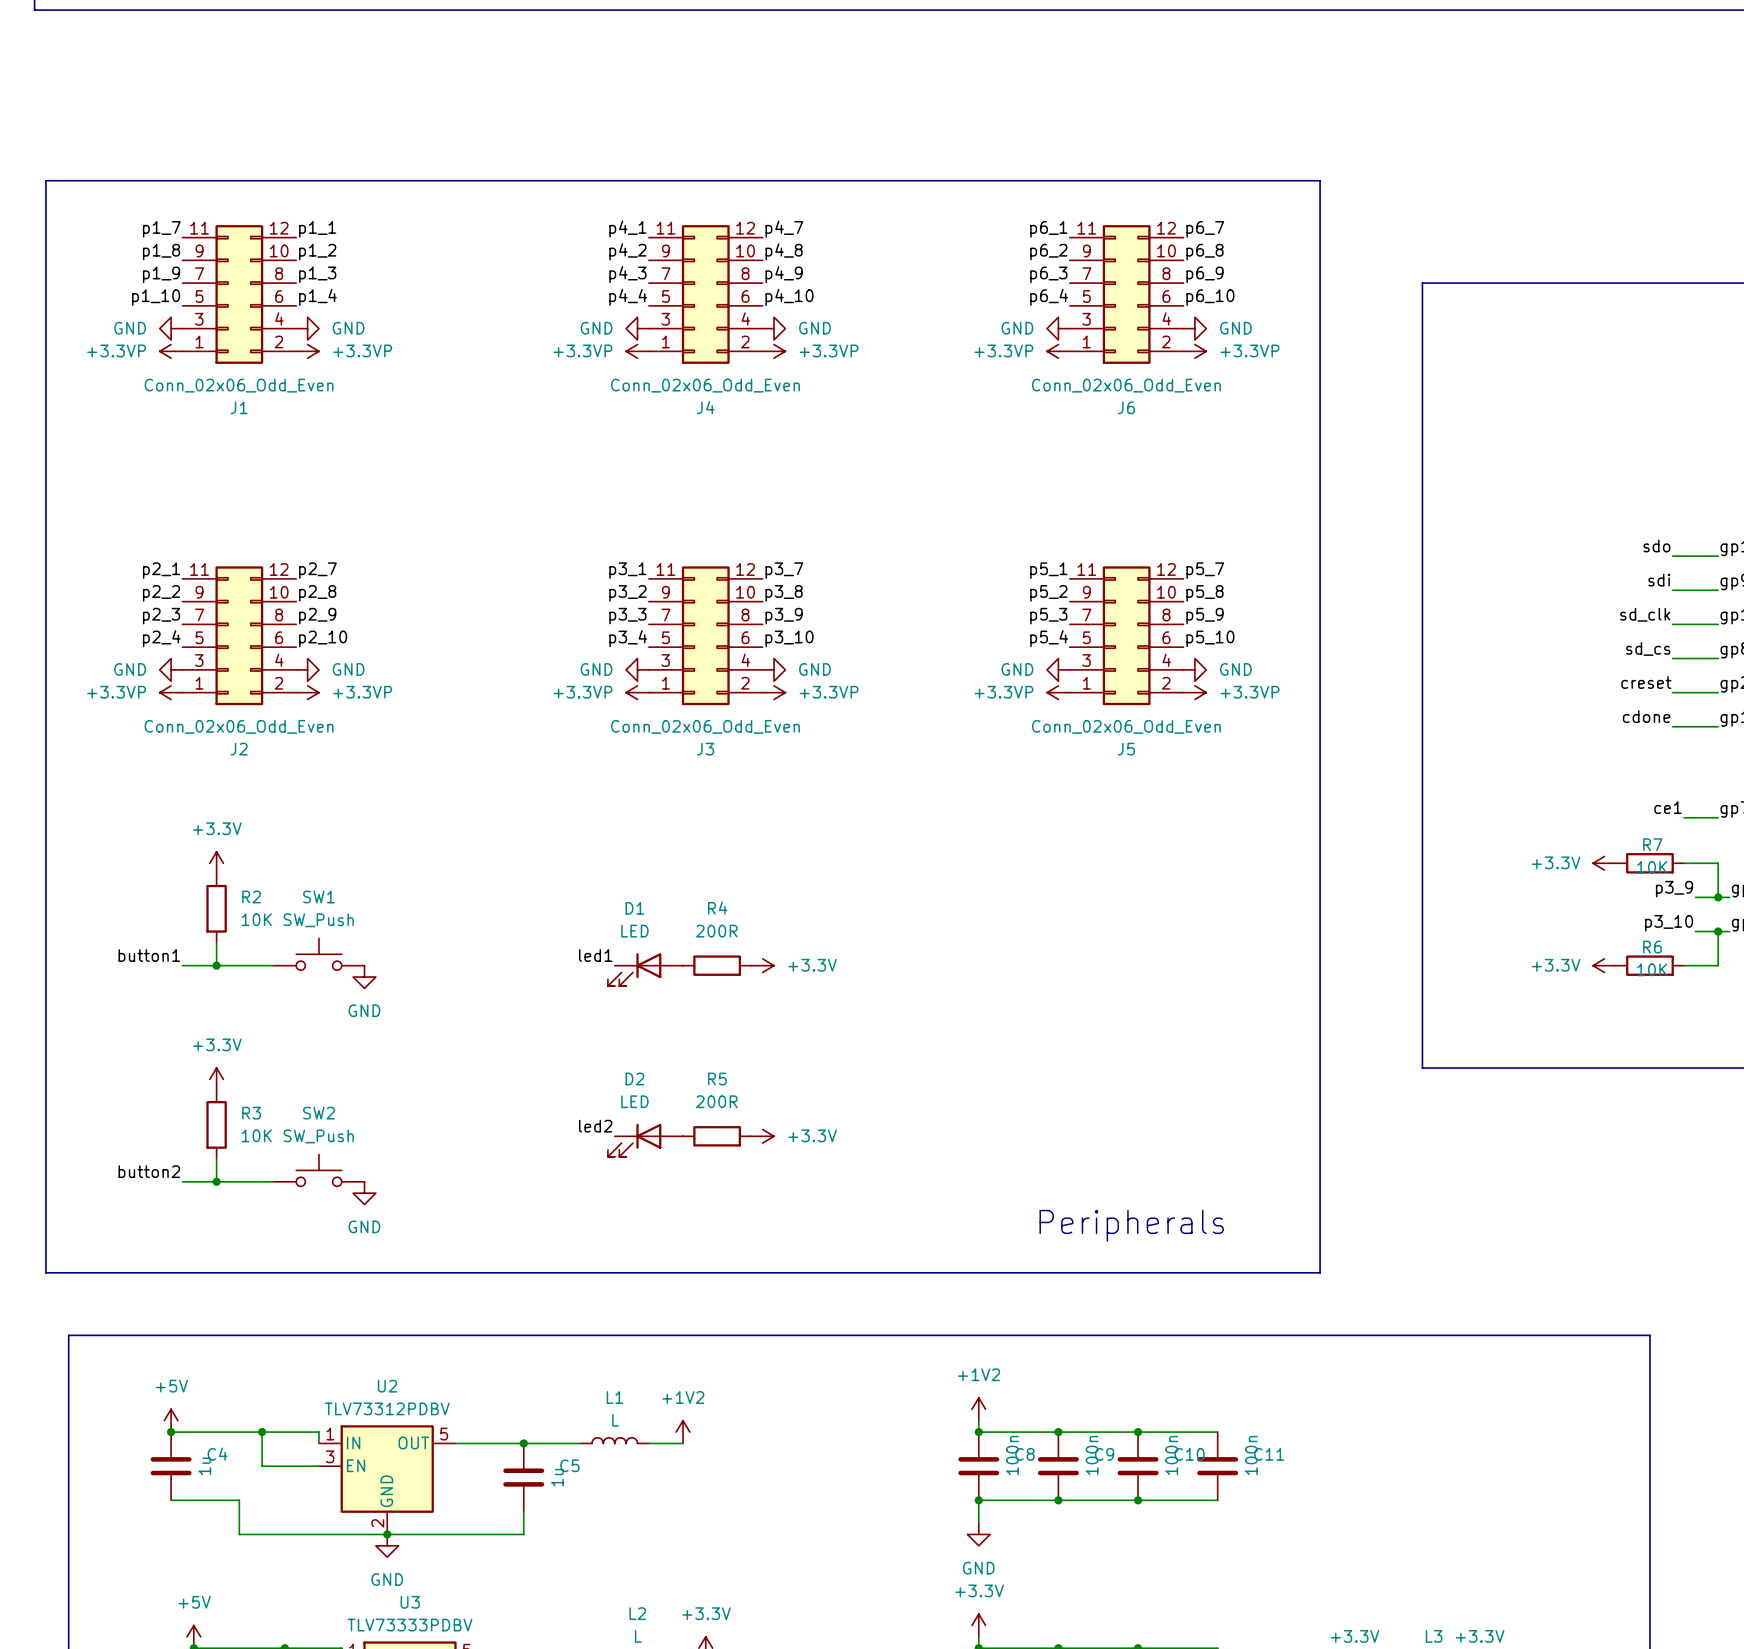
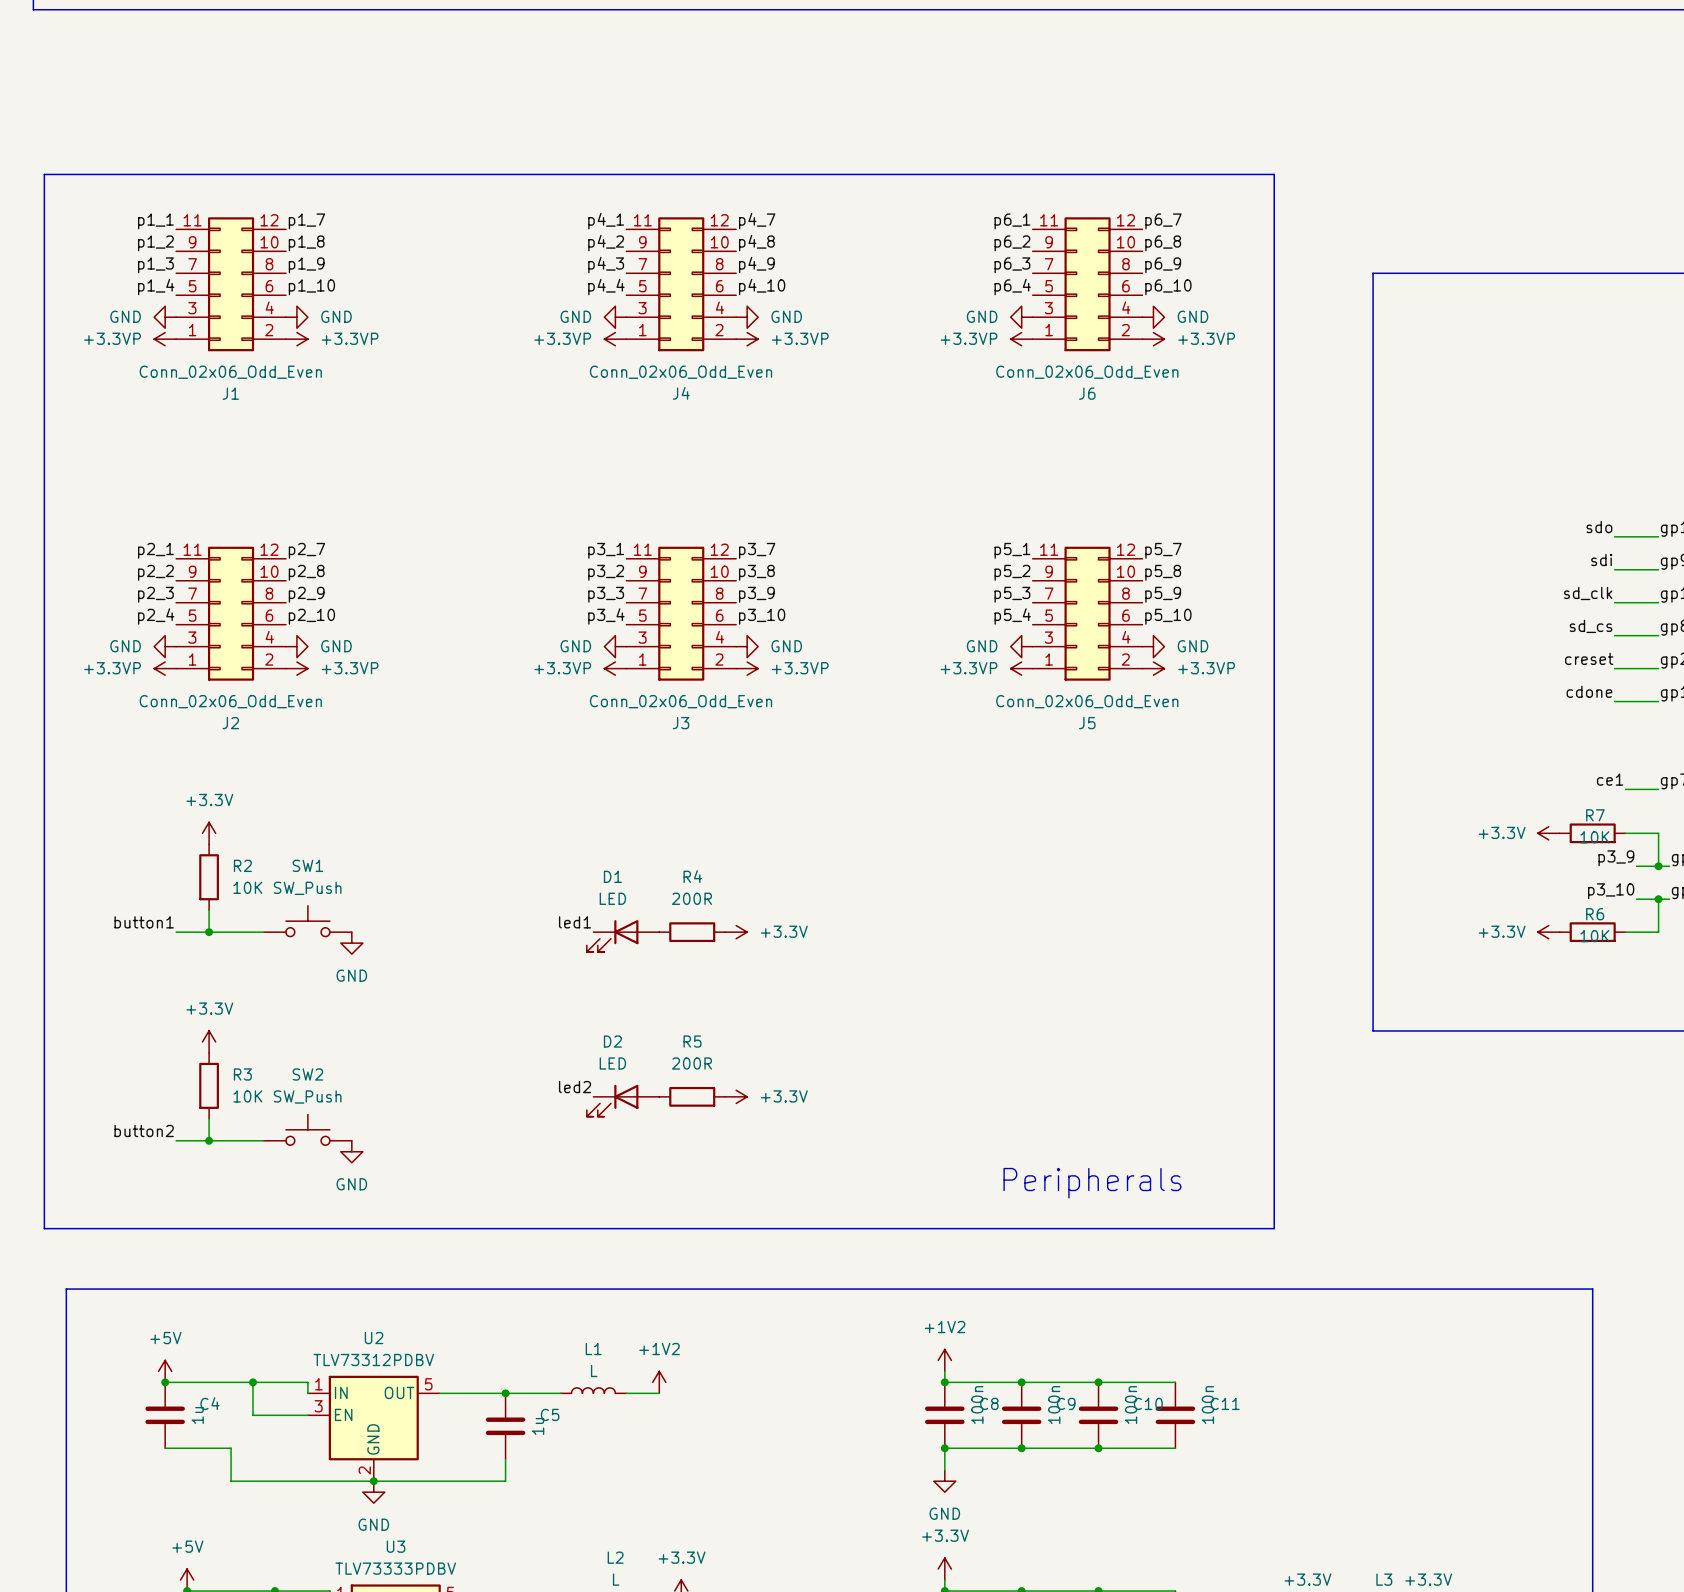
label: p1_7 (161, 229) -> p1_1 (155, 221)
label: p1_1 (317, 229) -> p1_7 (306, 221)
label: p1_8 (161, 252) -> p1_2 (155, 243)
label: p1_2 (317, 252) -> p1_8 (306, 243)
label: p1_9 (161, 274) -> p1_3 (155, 265)
label: p1_3 (317, 274) -> p1_9 (306, 265)
label: p1_10 (156, 297) -> p1_4 (156, 287)
label: p1_4 (317, 297) -> p1_10 (311, 287)

